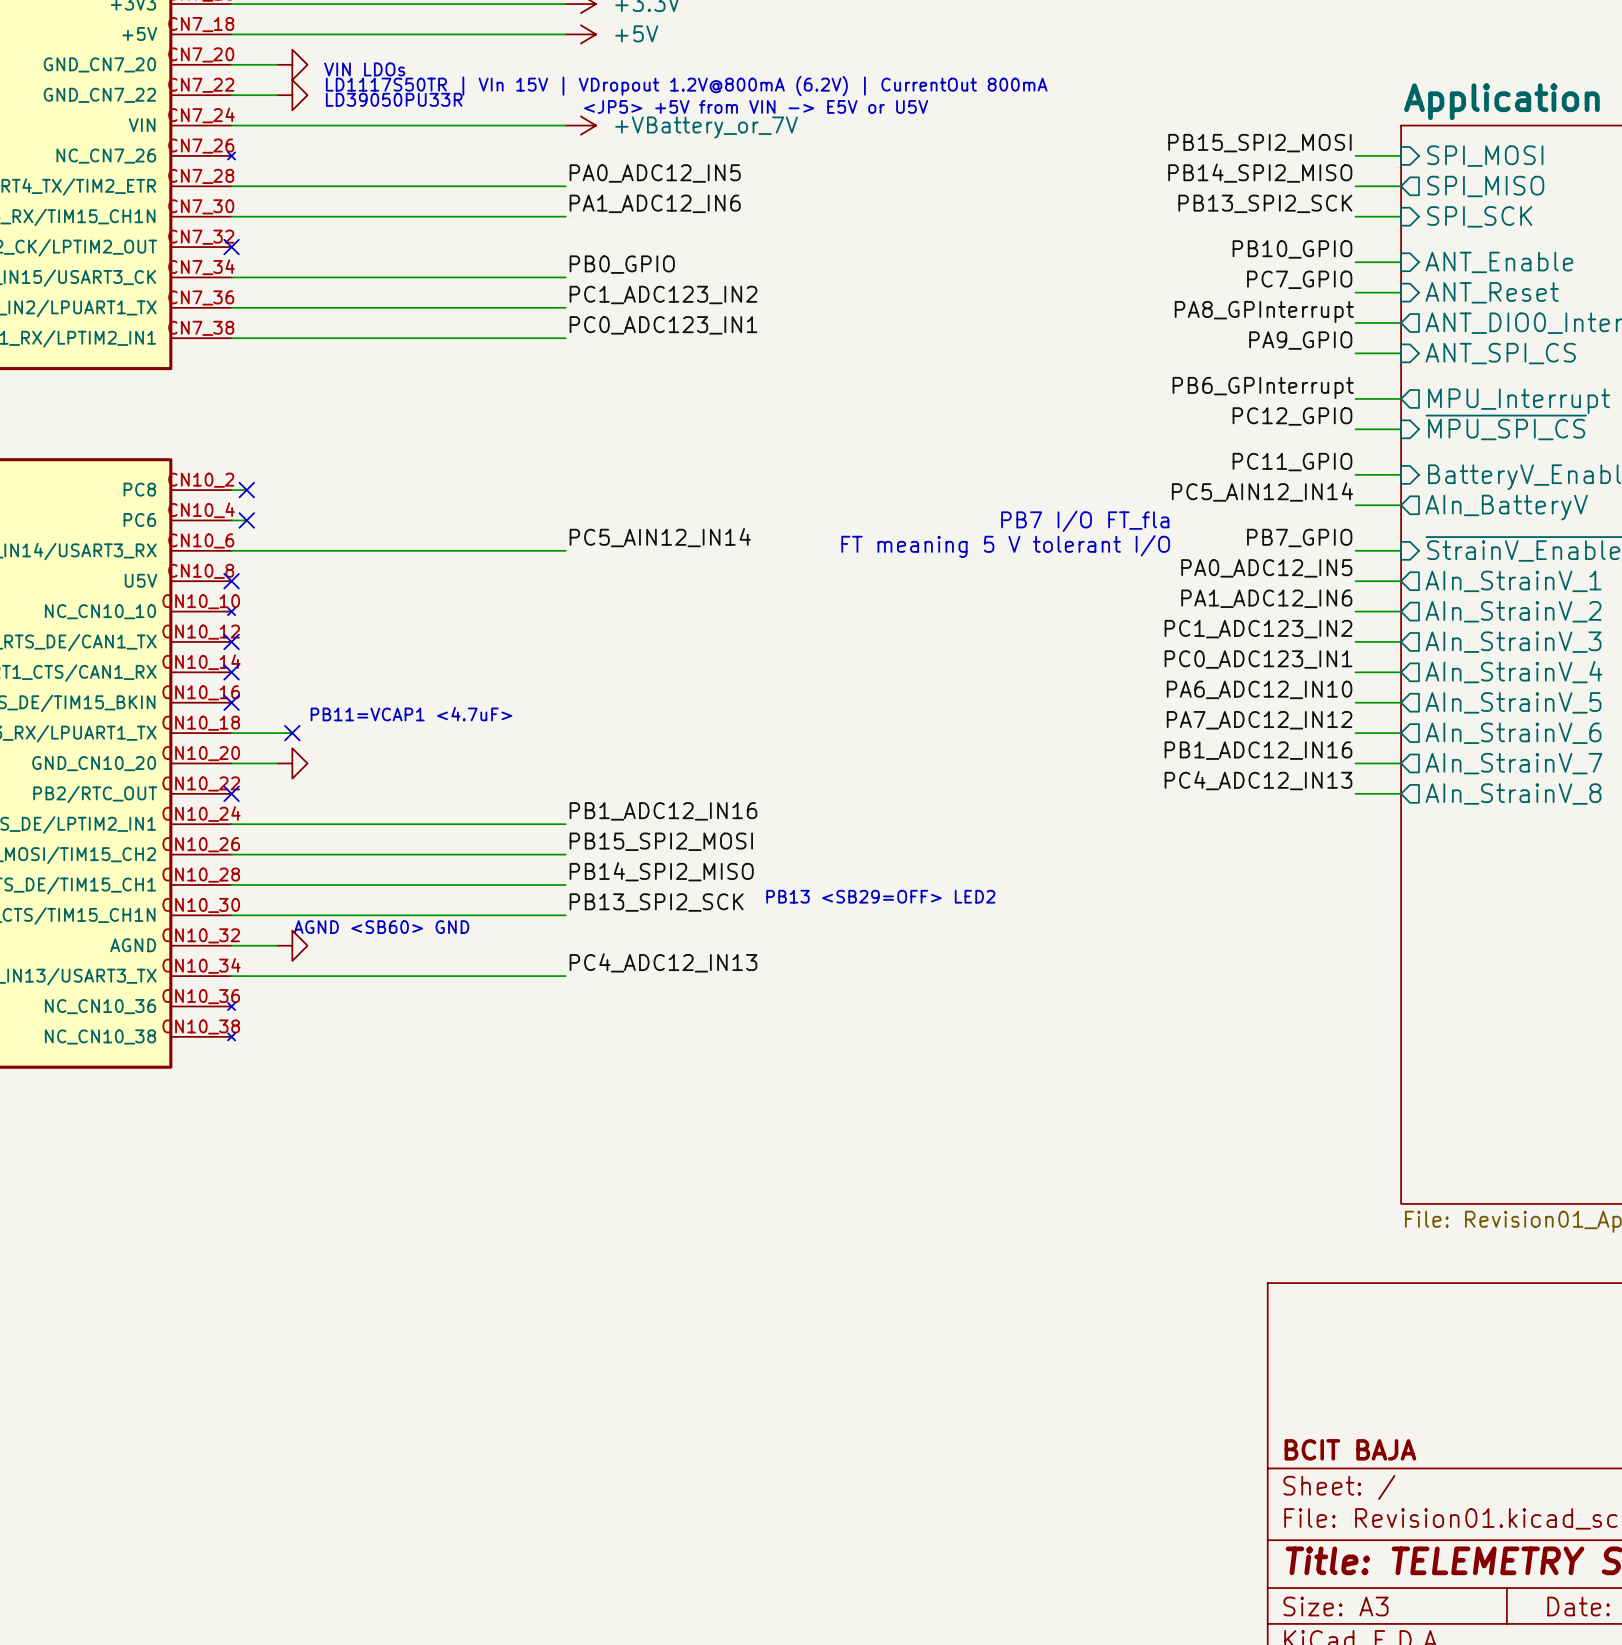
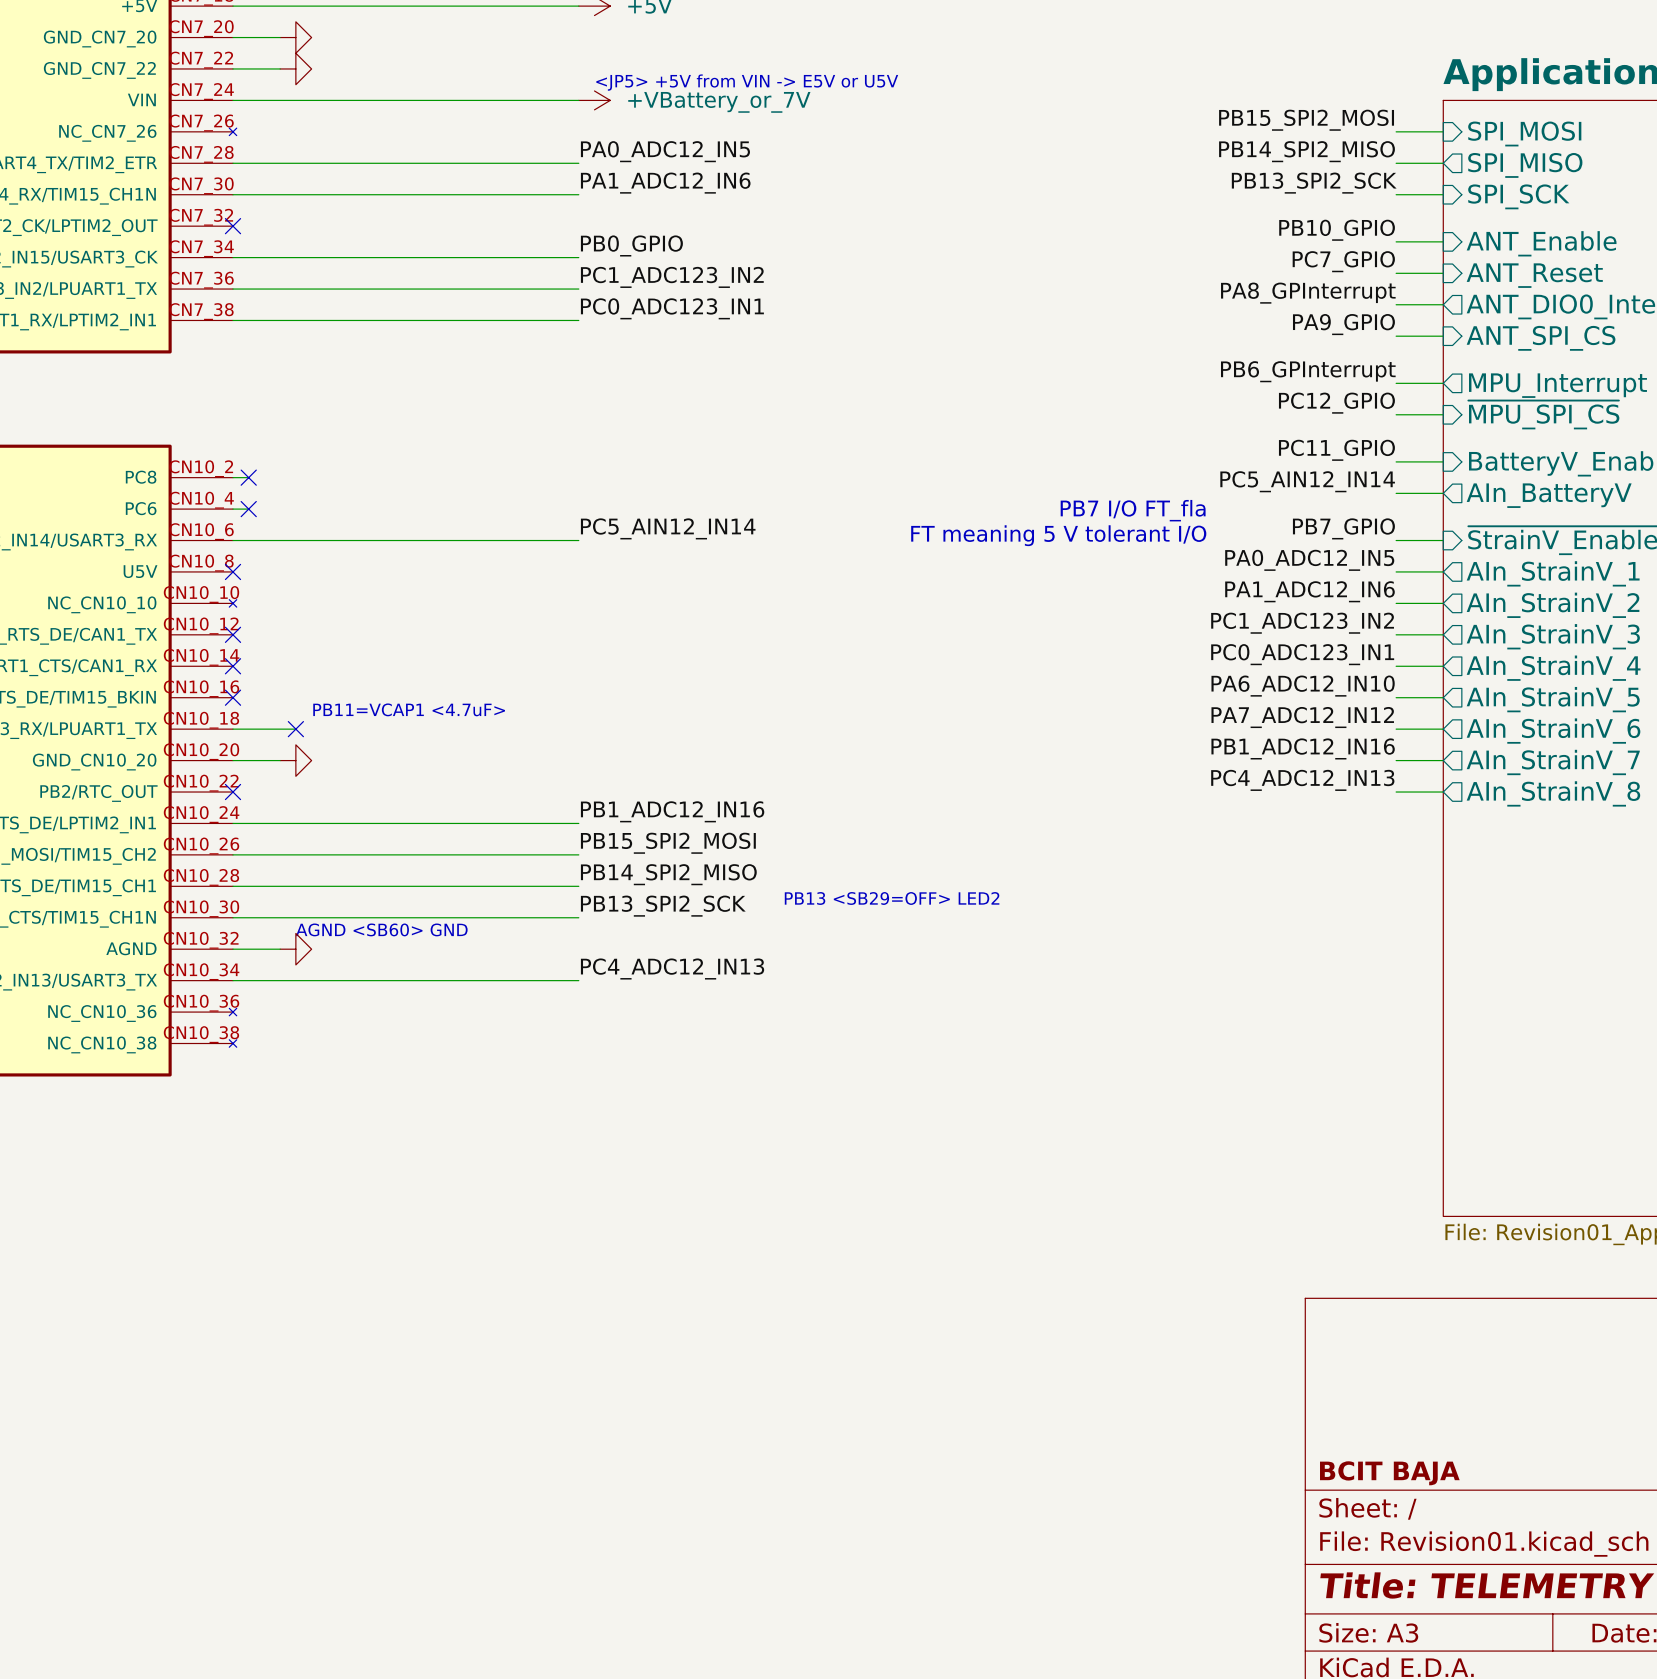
text: VIN LDOs (364, 69) -> none
text: LD1117S50TR | VIn 15V | VDropout 1.2V@800mA (6.2V) | CurrentOut 800mA (686, 86) -> none
text: LD39050PU33R (394, 99) -> none

